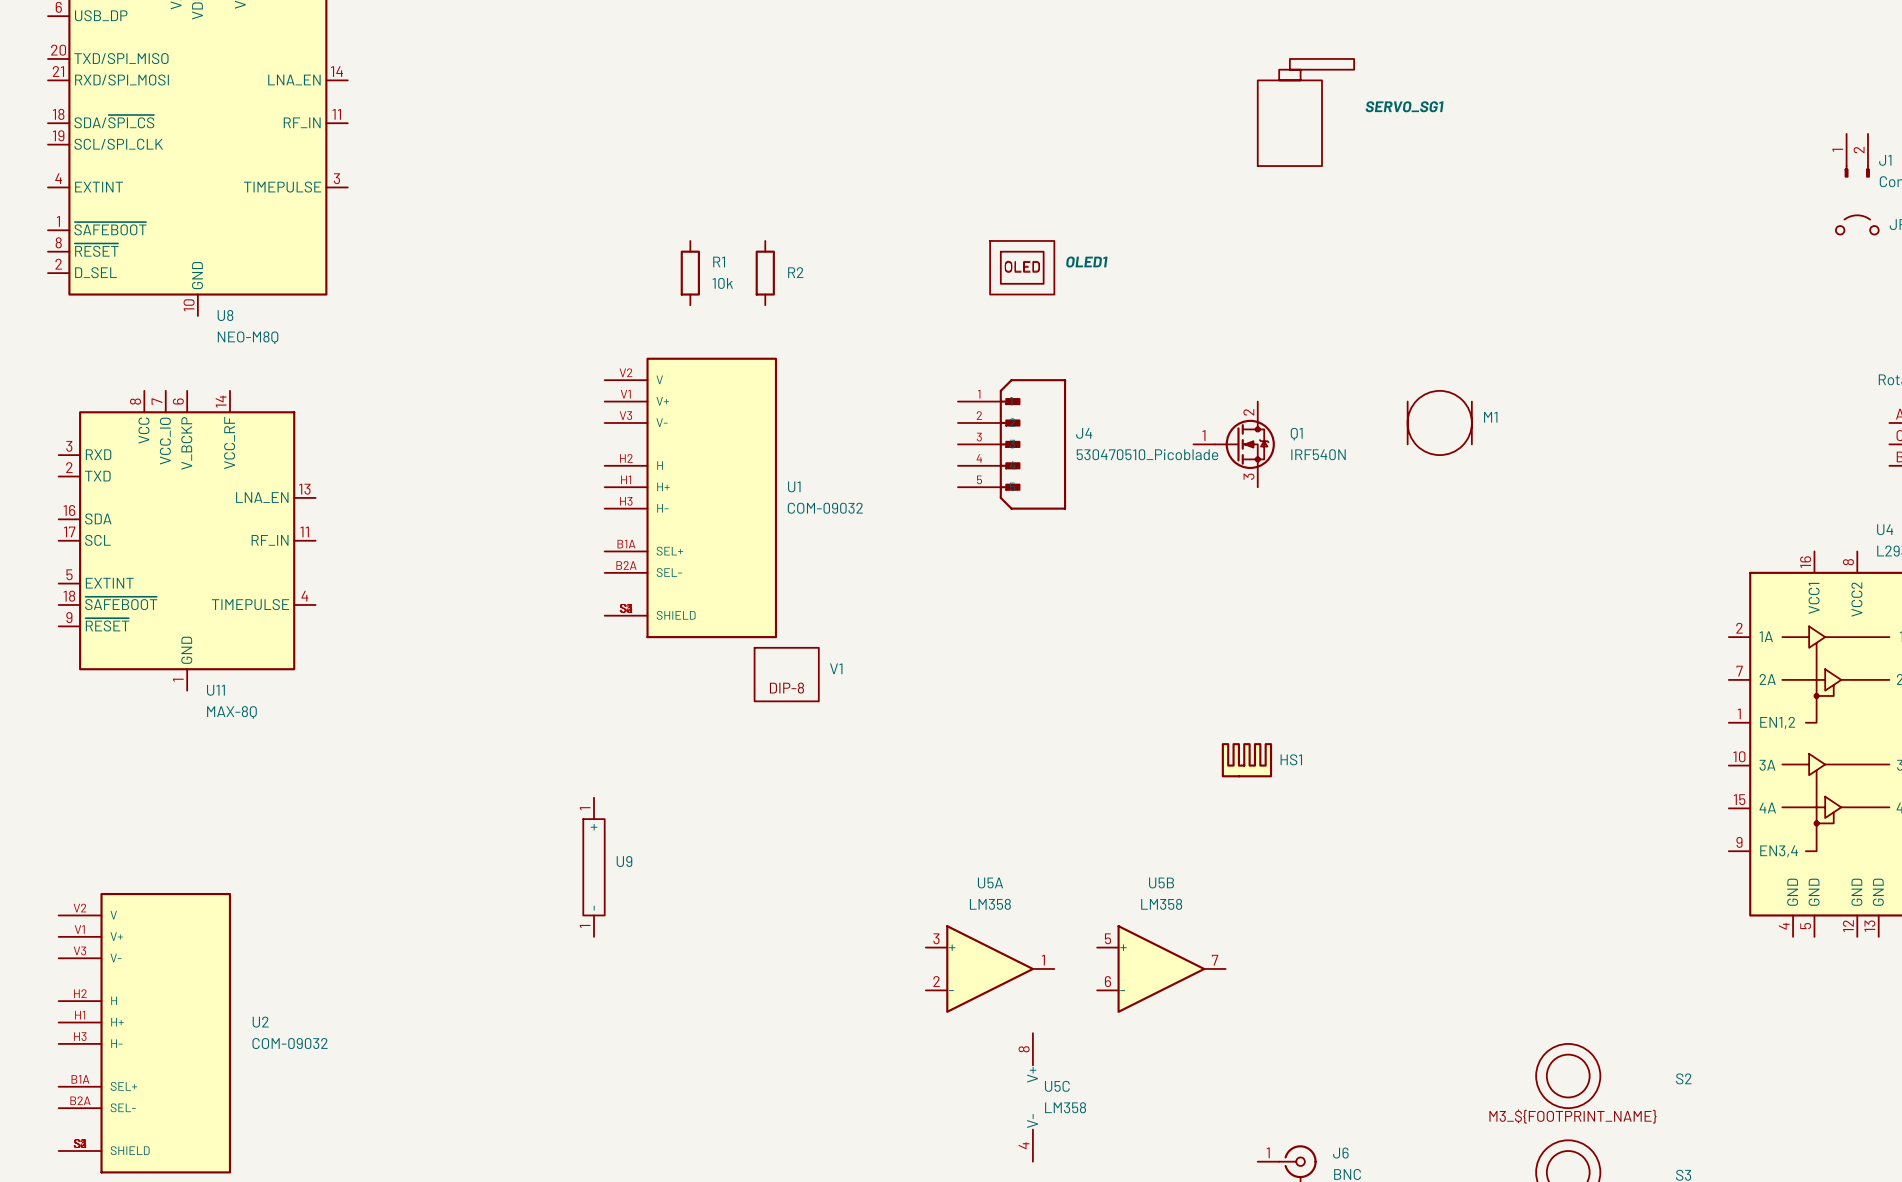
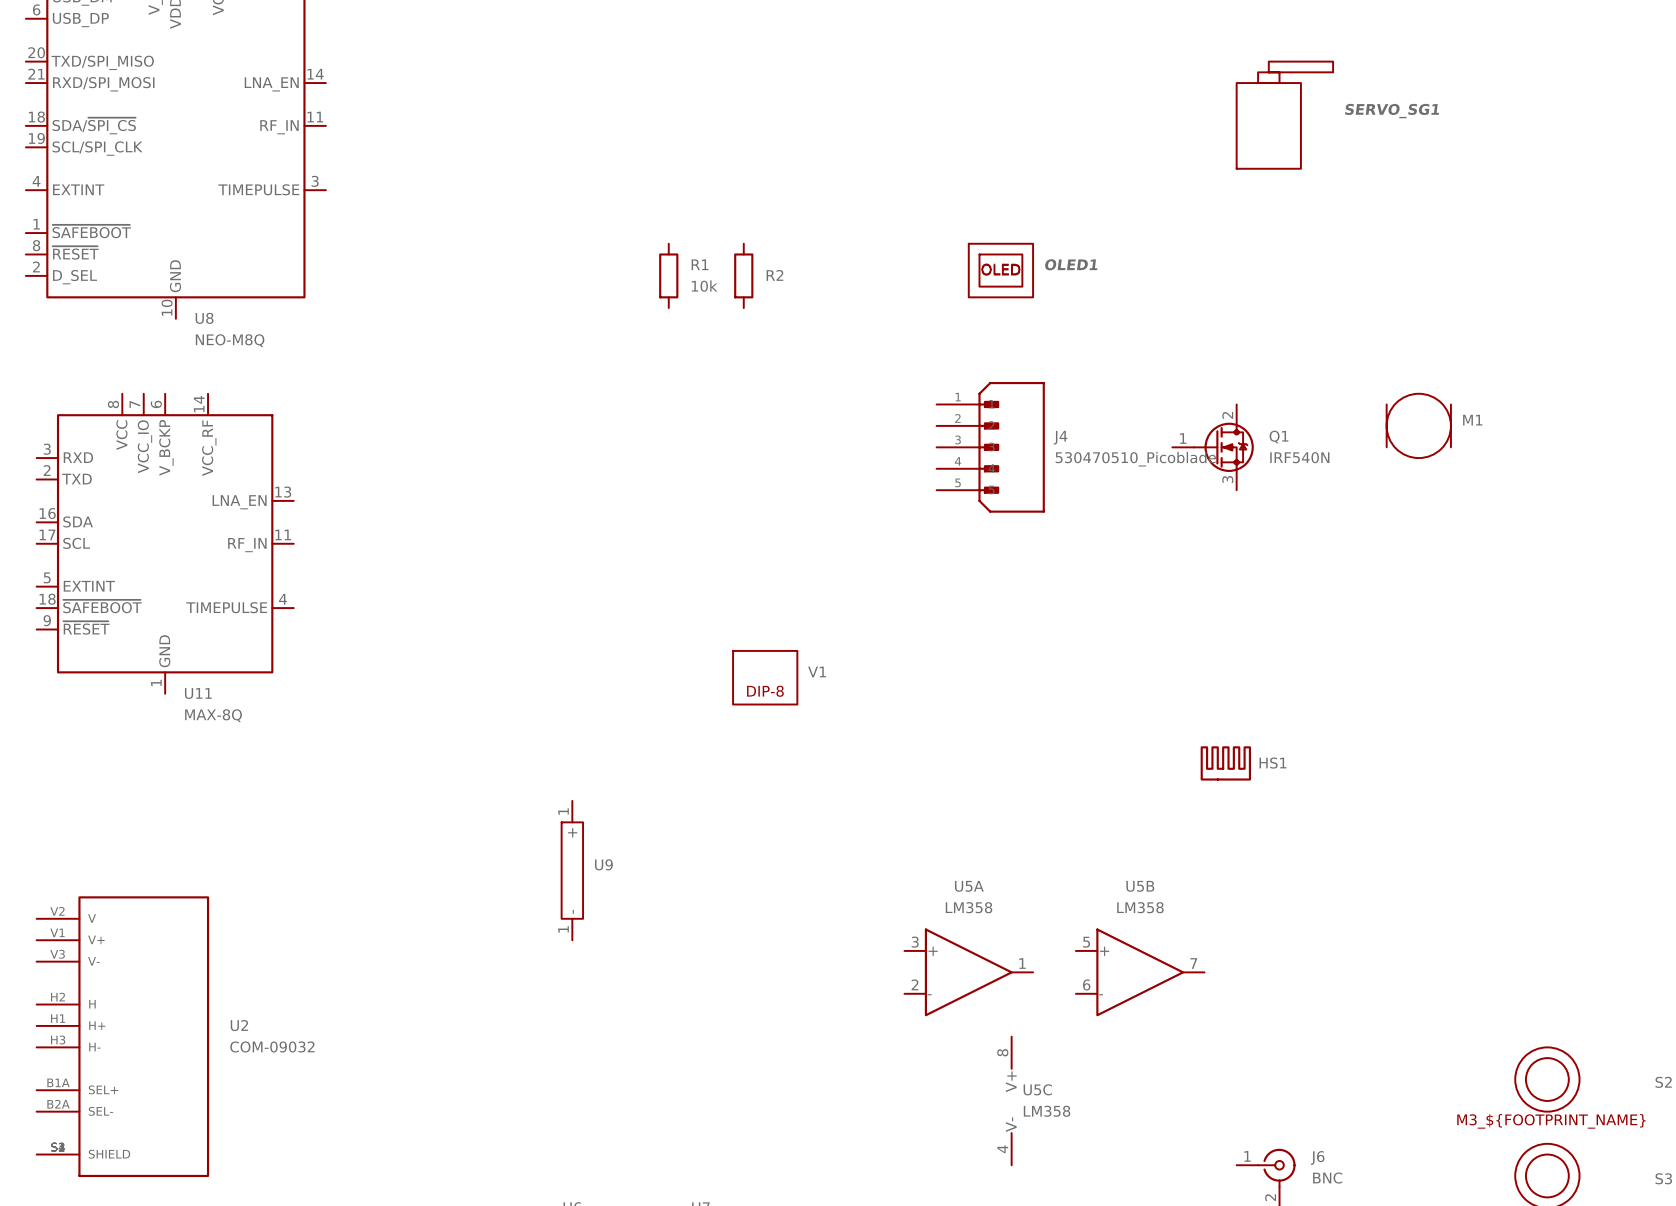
U1: COM-09032 (690, 497) -> none

